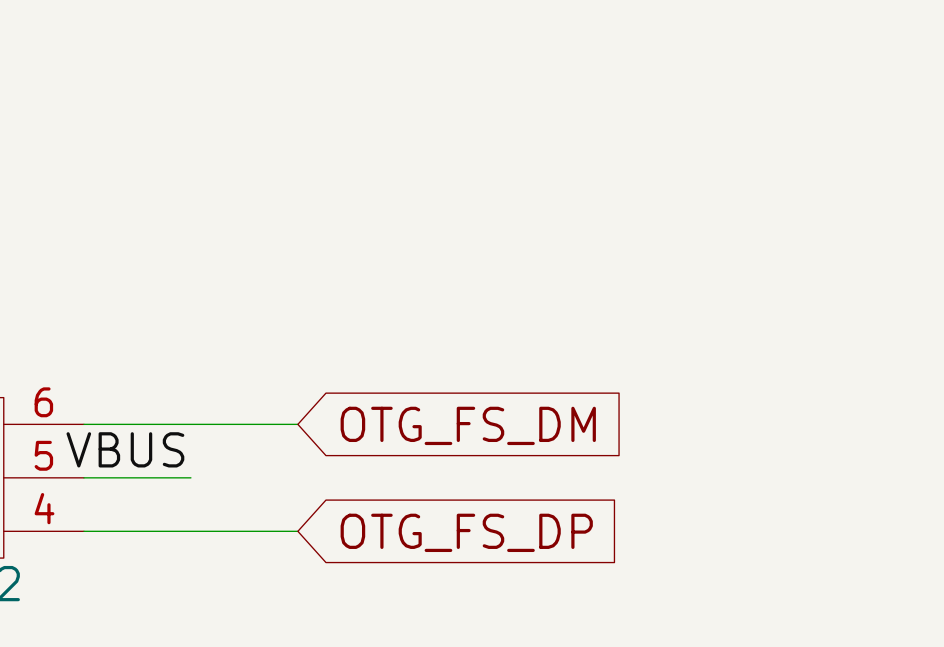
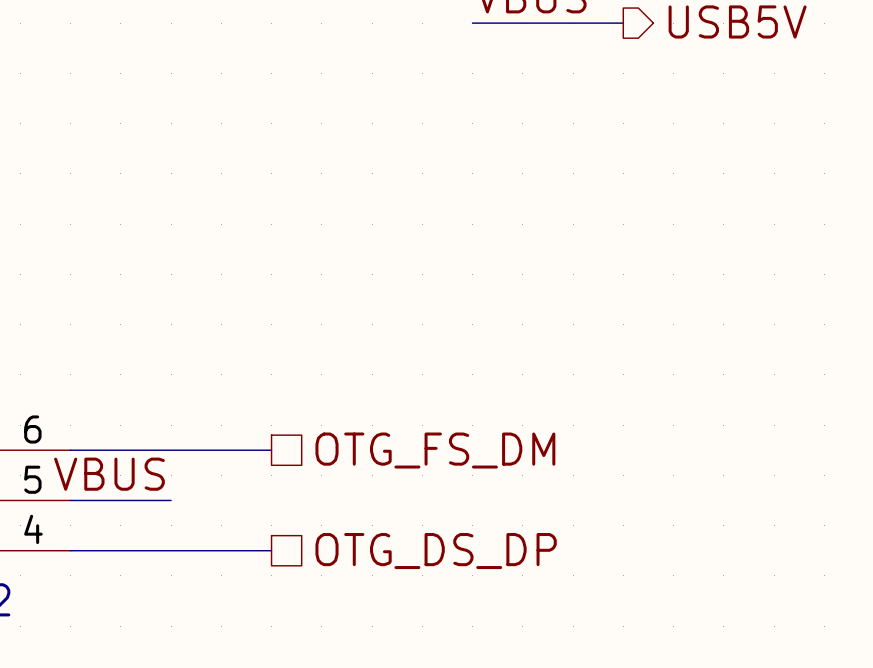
hierarchical label: none -> OTG_FS_DM (435, 450)
global label: OTG_FS_DM (468, 425) -> none
hierarchical label: none -> OTG_DS_DP (436, 551)
global label: OTG_FS_DP (466, 532) -> none

